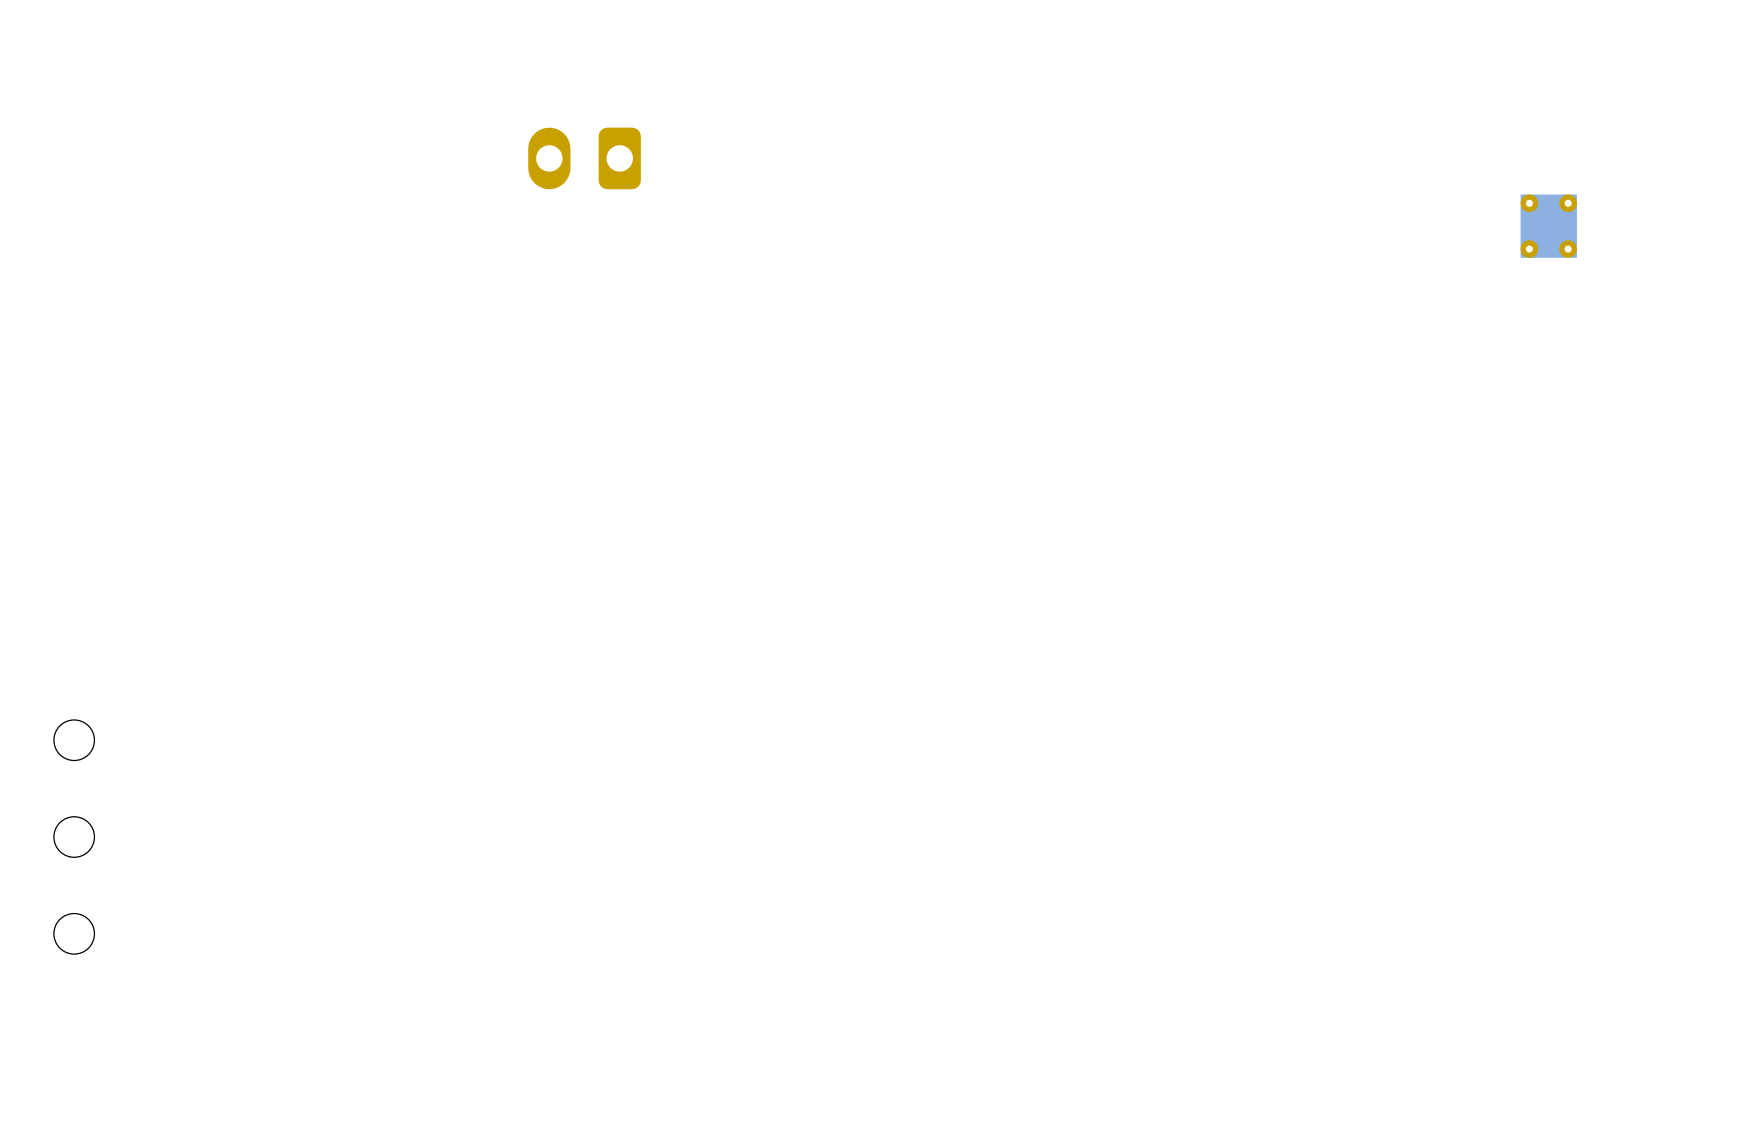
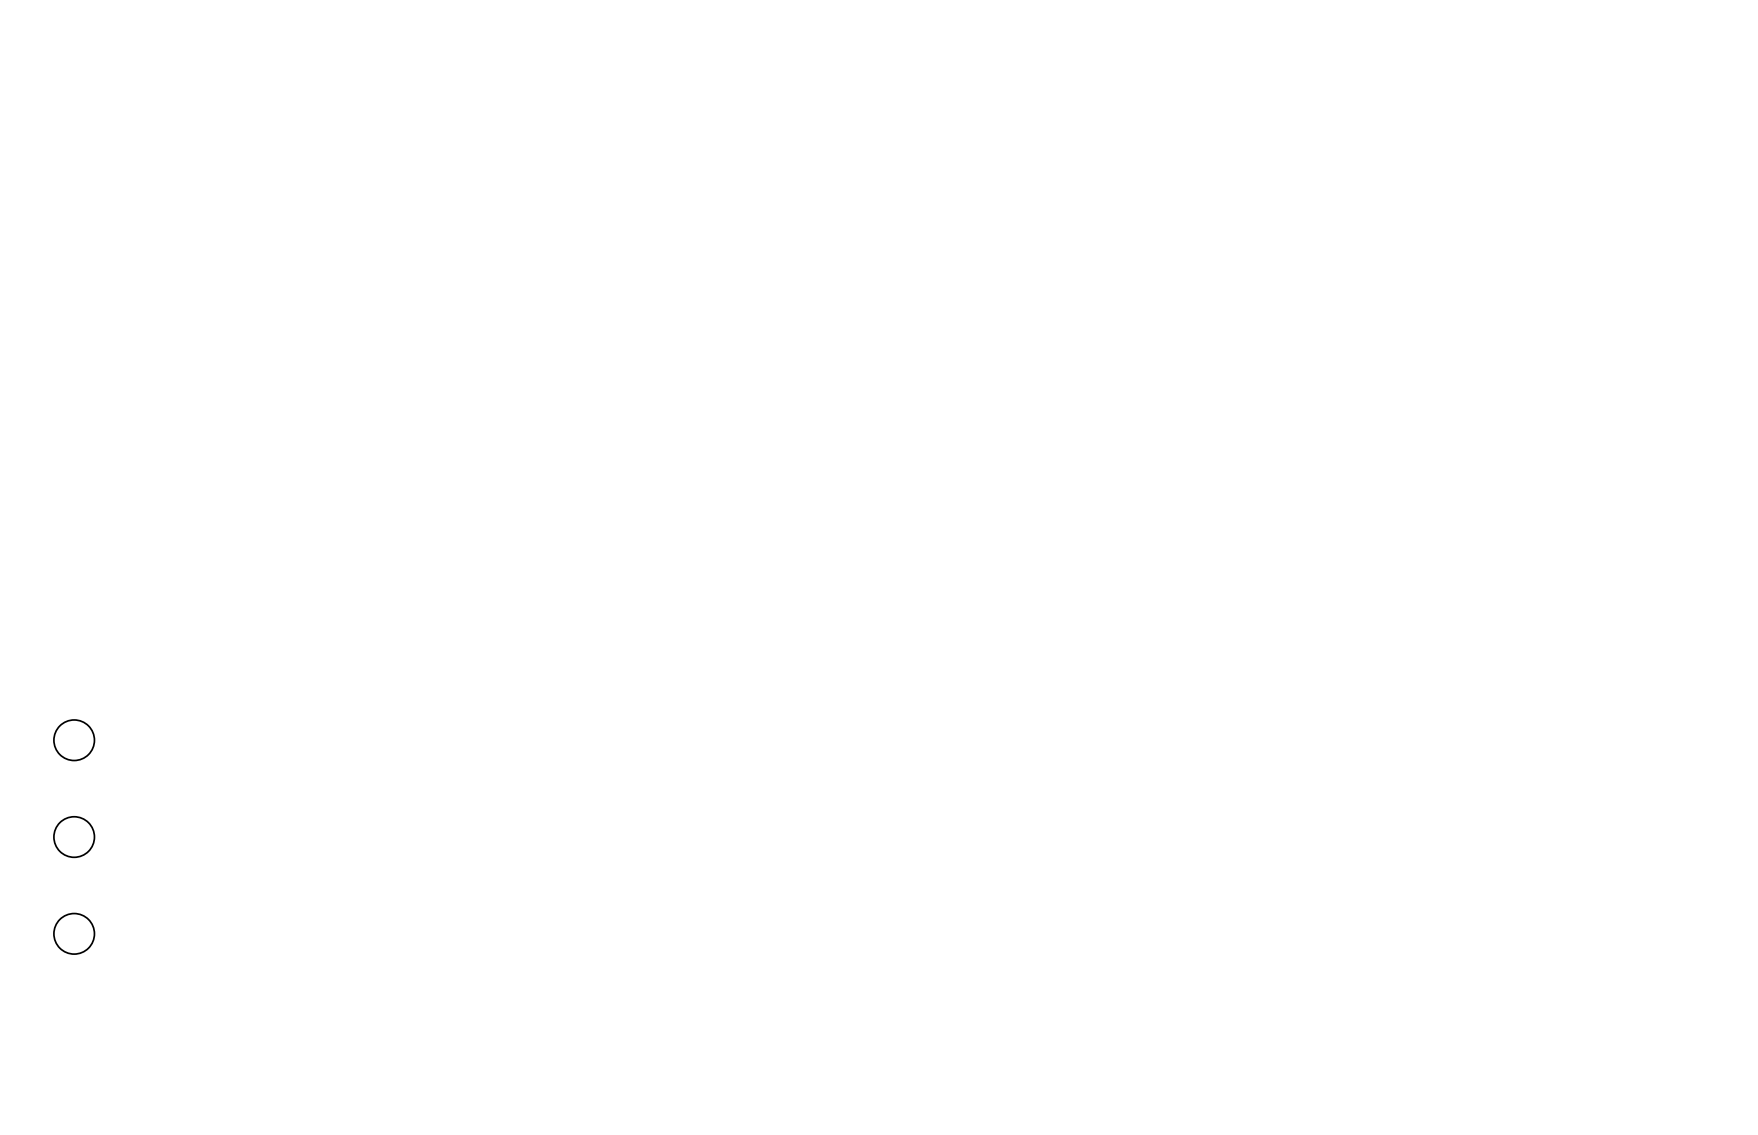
part: (584, 158) -> none
part: (1548, 226) -> none

